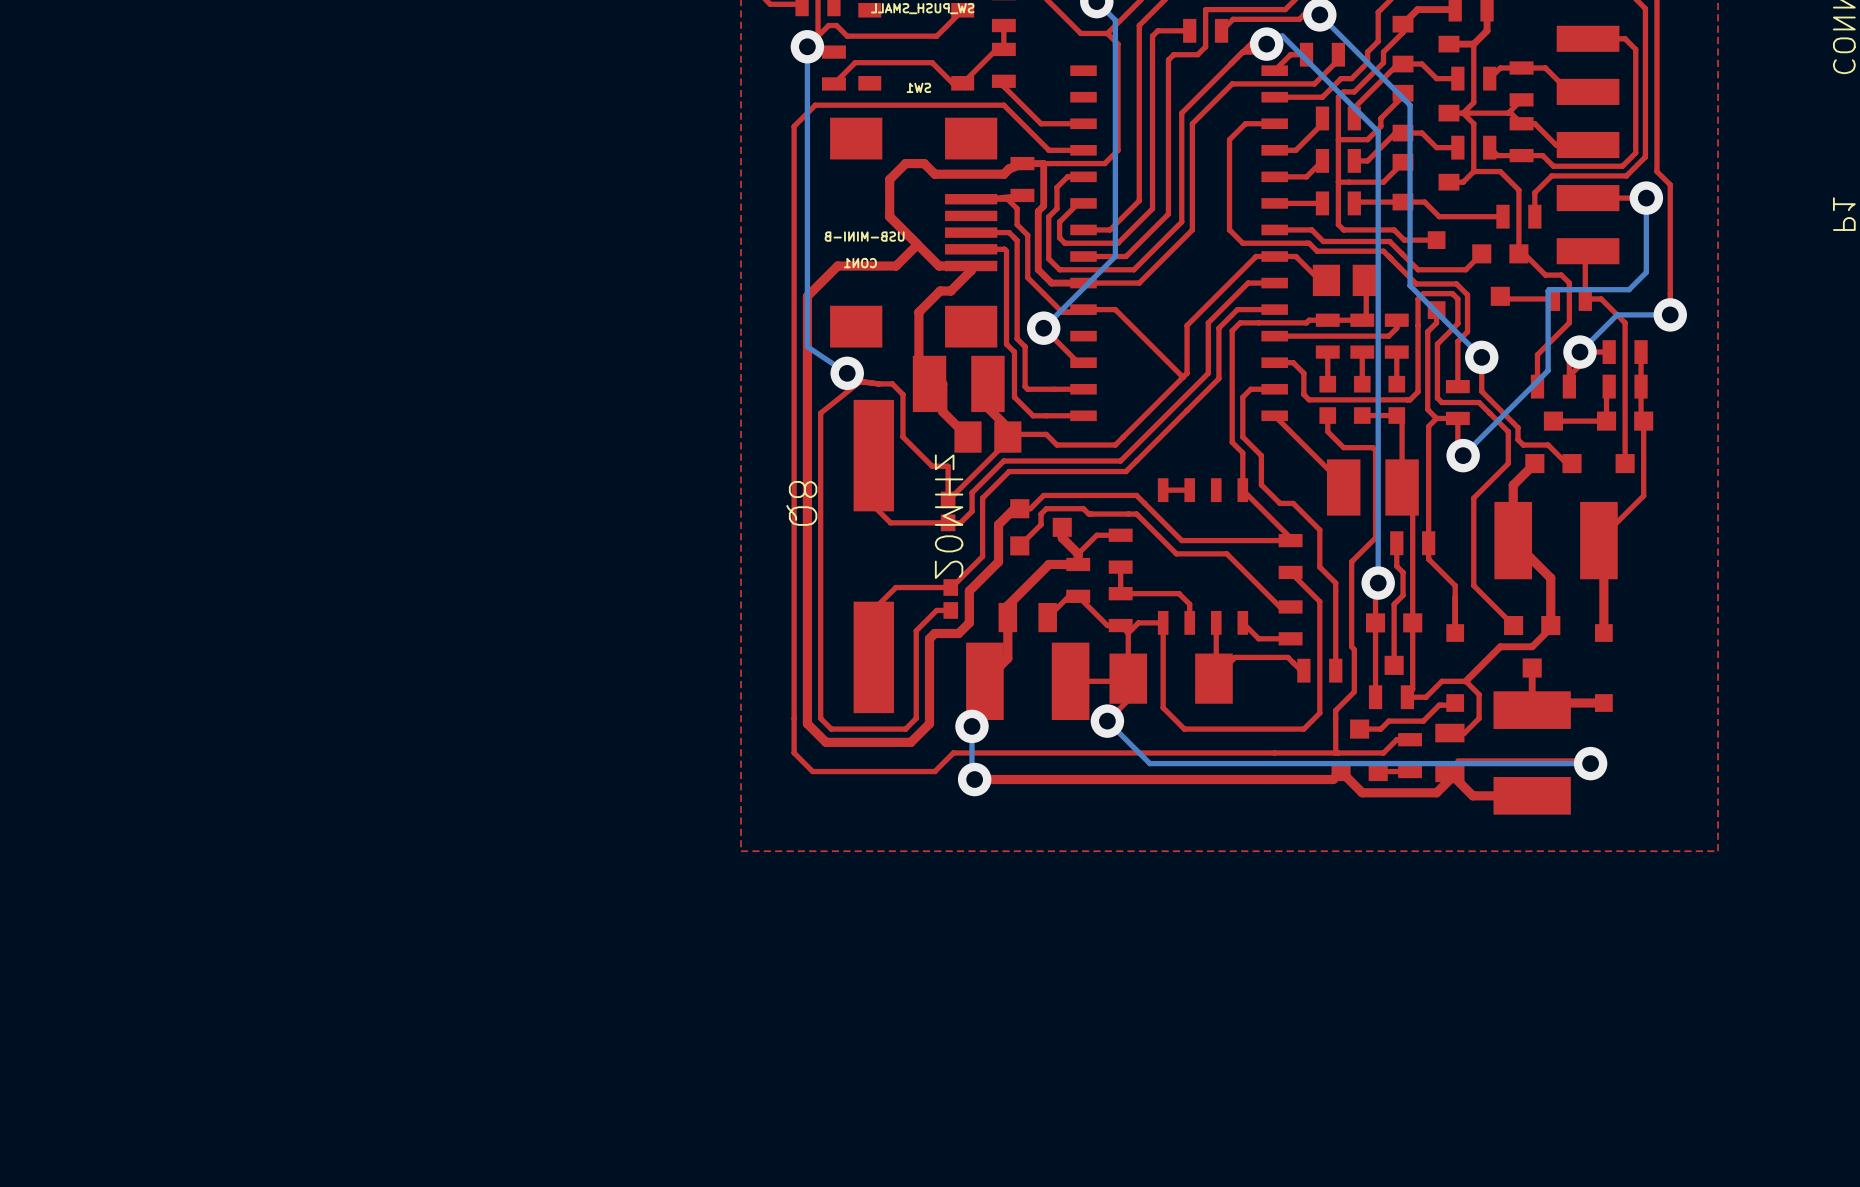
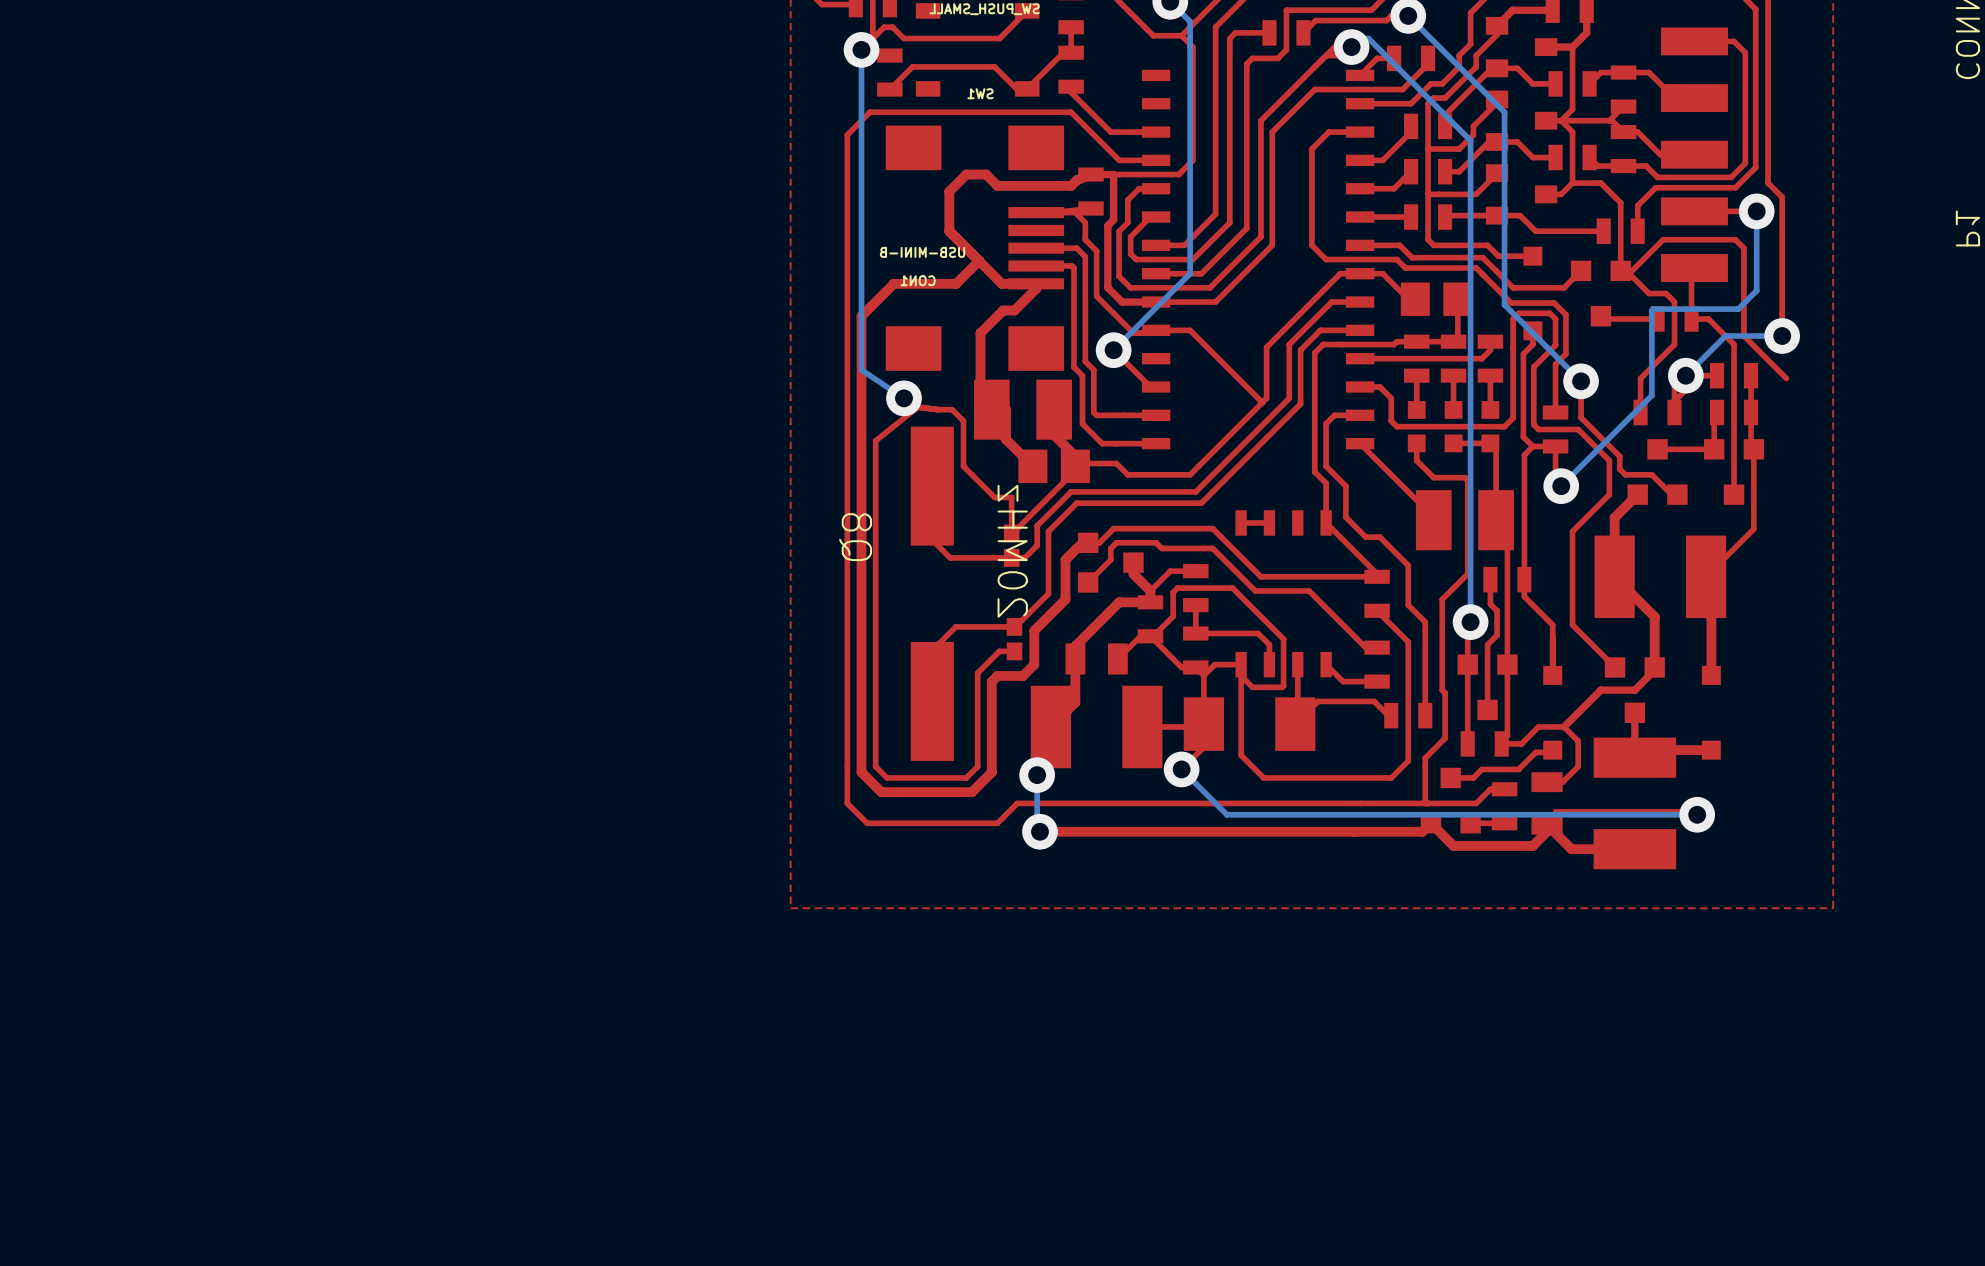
top track: none -> (1626, 270) (1632, 270) (1663, 239) (1735, 239) (1743, 248) (1743, 336) (1786, 378)
top track: none -> (1150, 636) (1153, 636) (1173, 616) (1173, 592) (1177, 588) (1232, 588) (1283, 639) (1282, 687) (1252, 687) (1241, 675)

